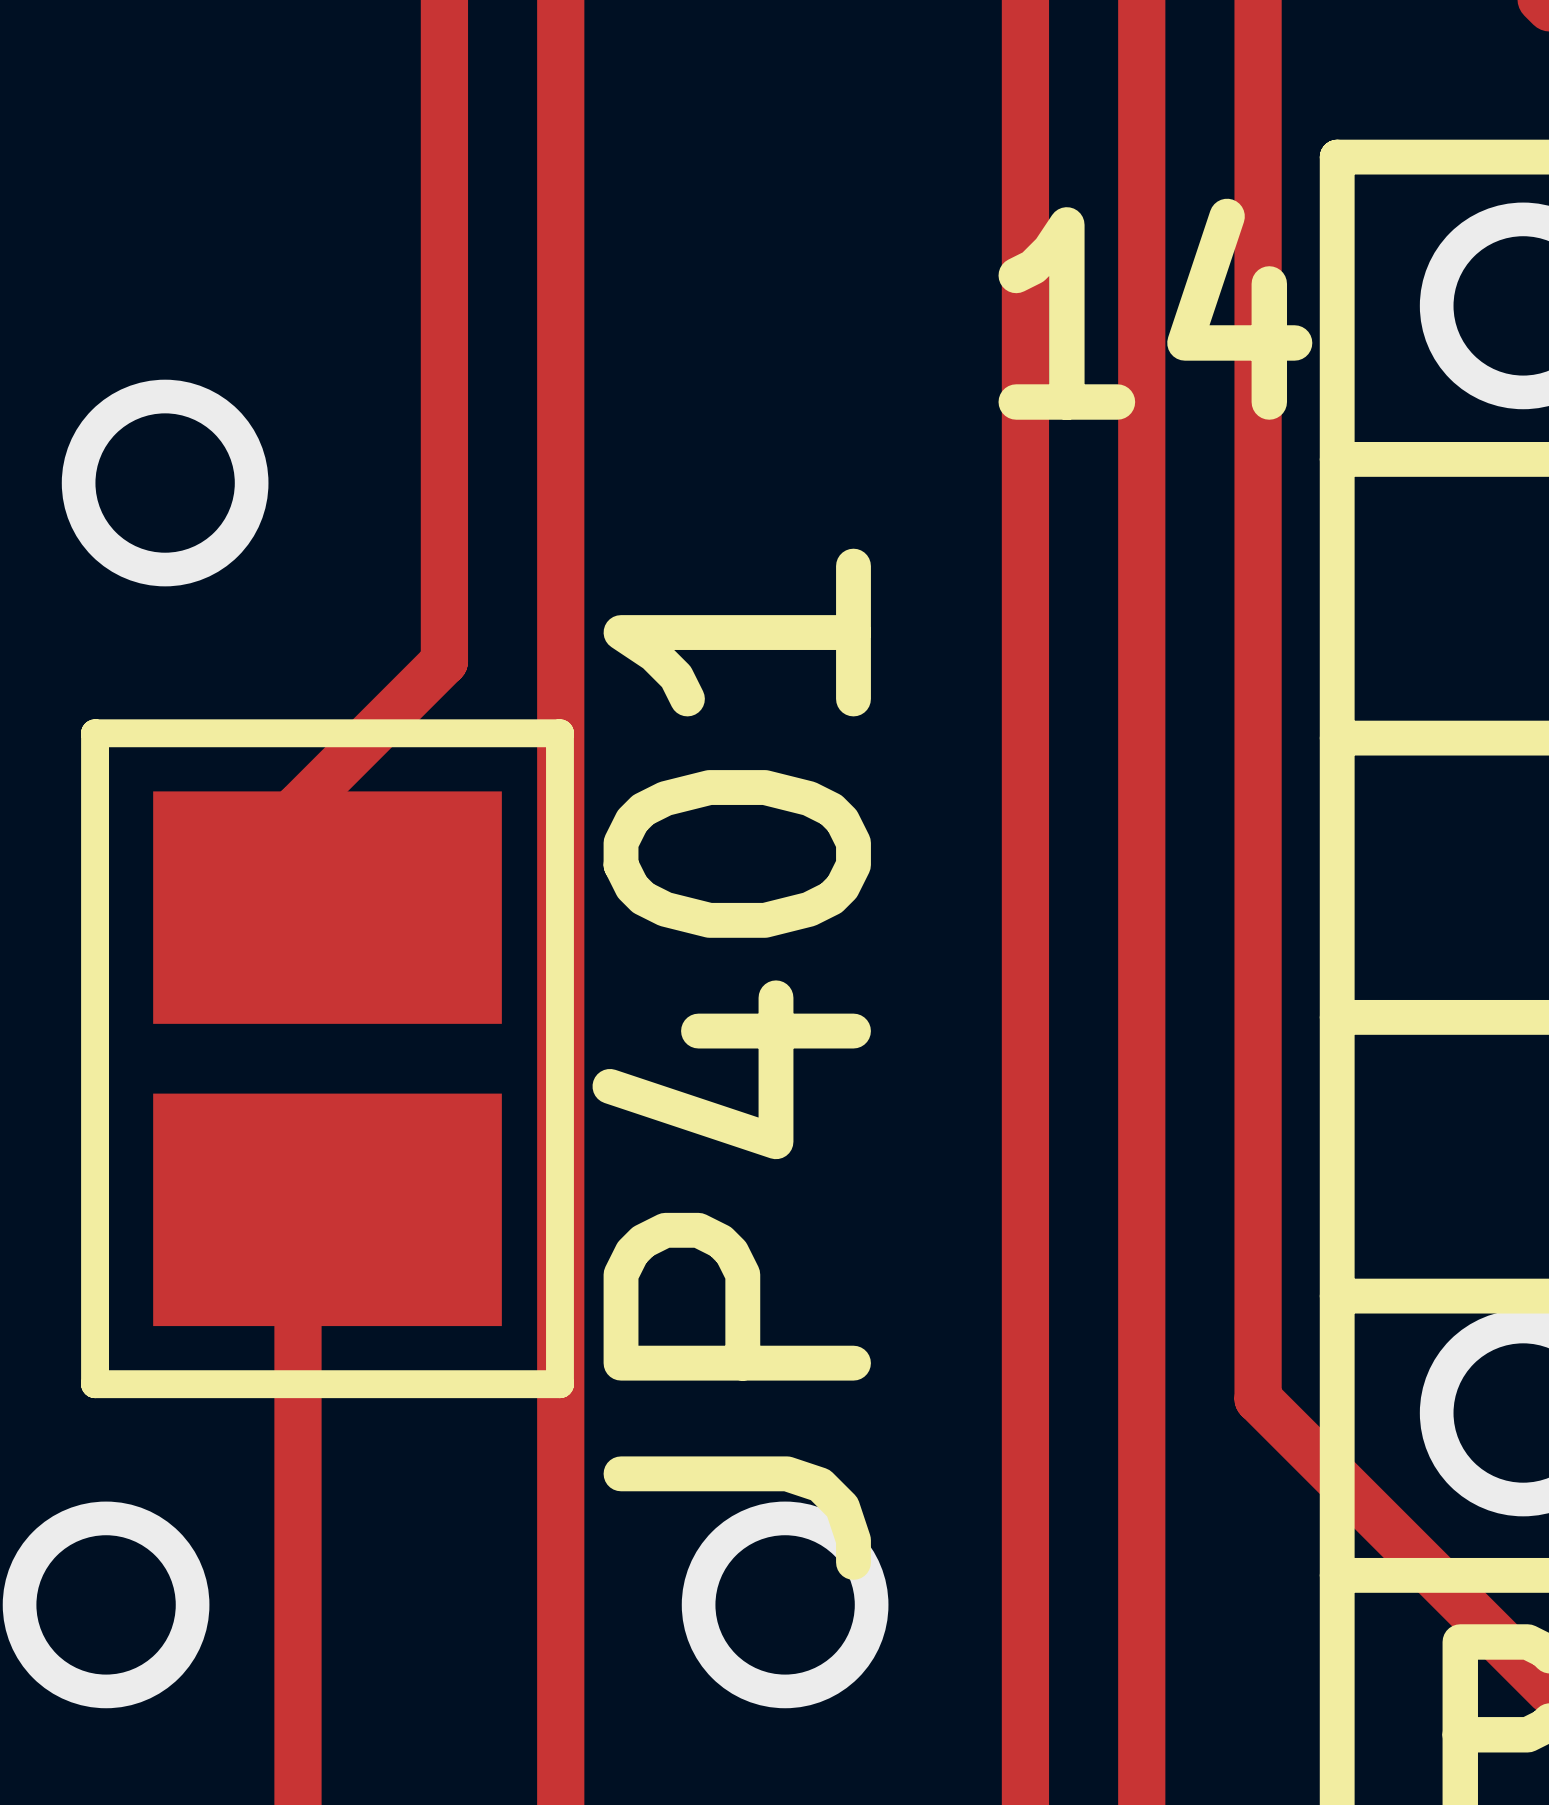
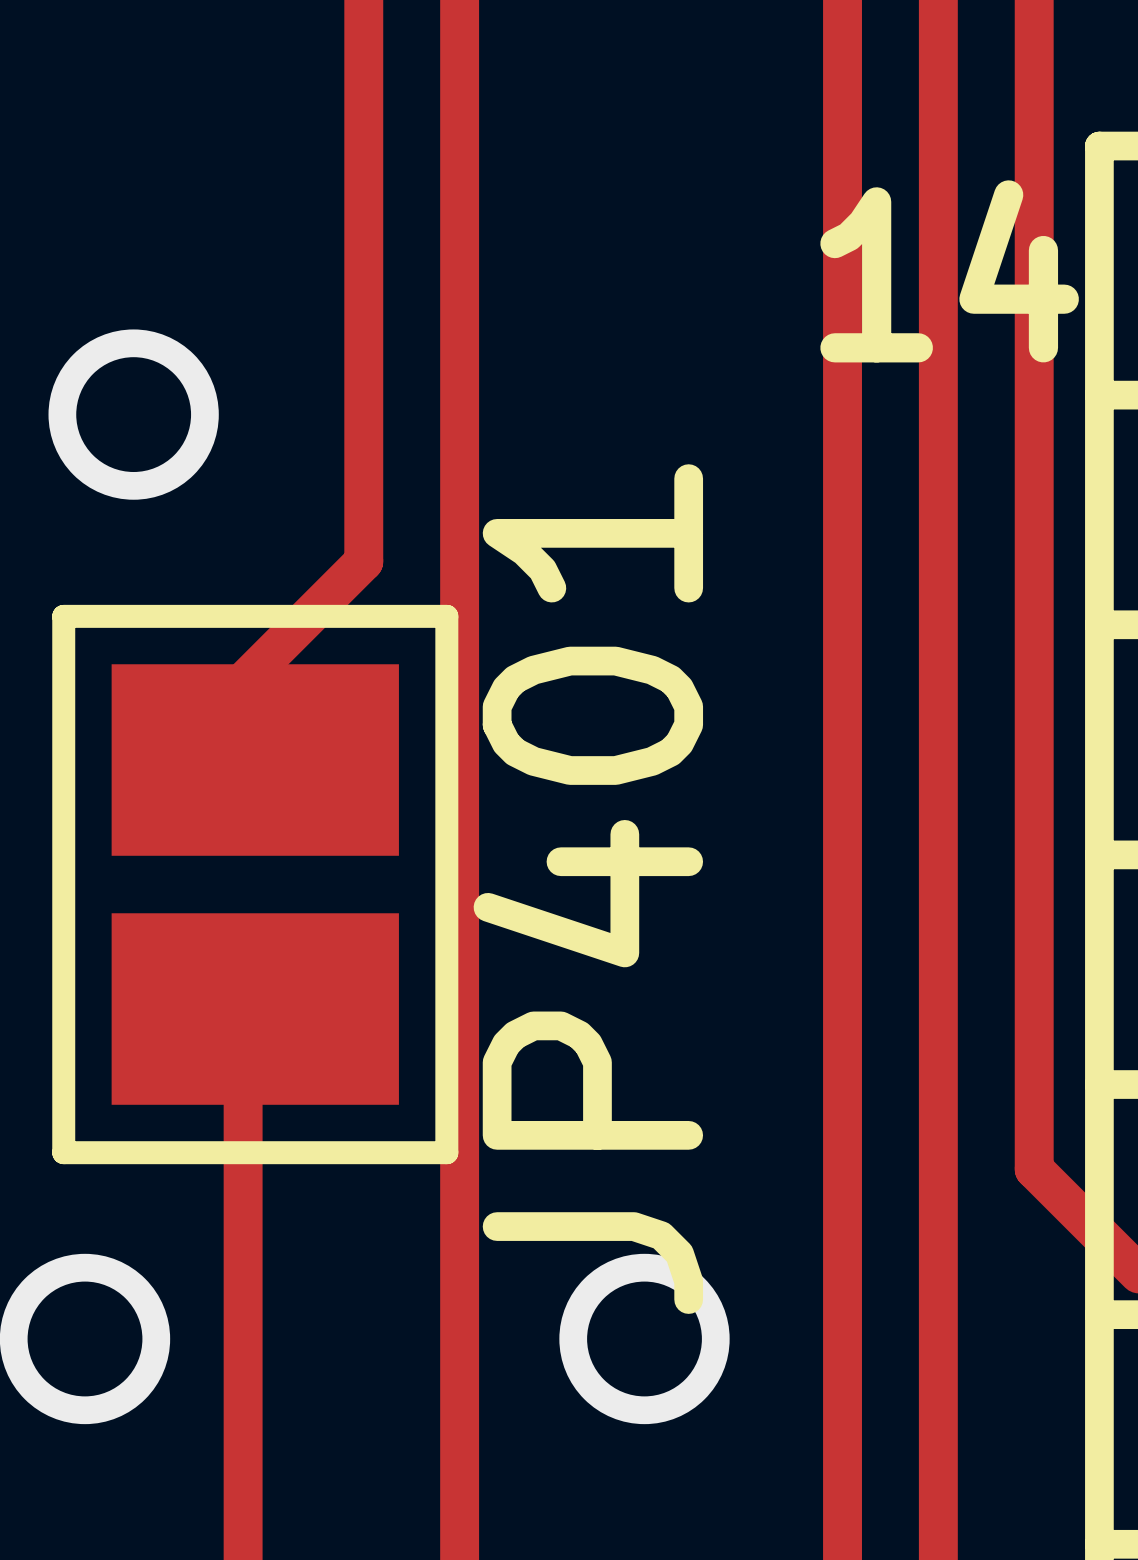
JP401 position: (327, 1058) -> (255, 884)

